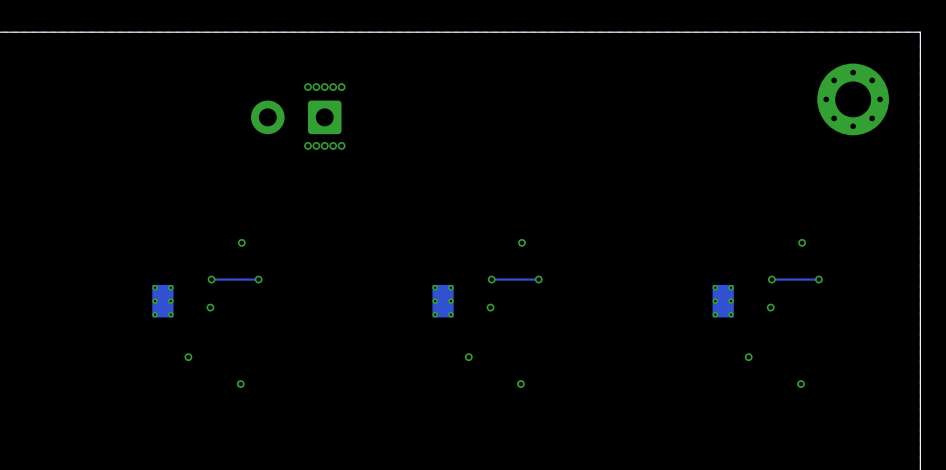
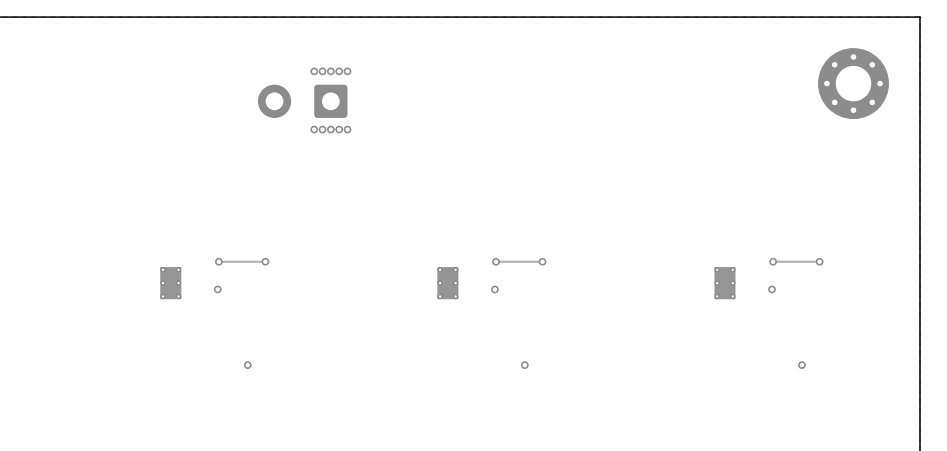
via: (241, 242) -> none
via: (521, 242) -> none
via: (802, 242) -> none
via: (188, 357) -> none
via: (468, 357) -> none
via: (748, 357) -> none

